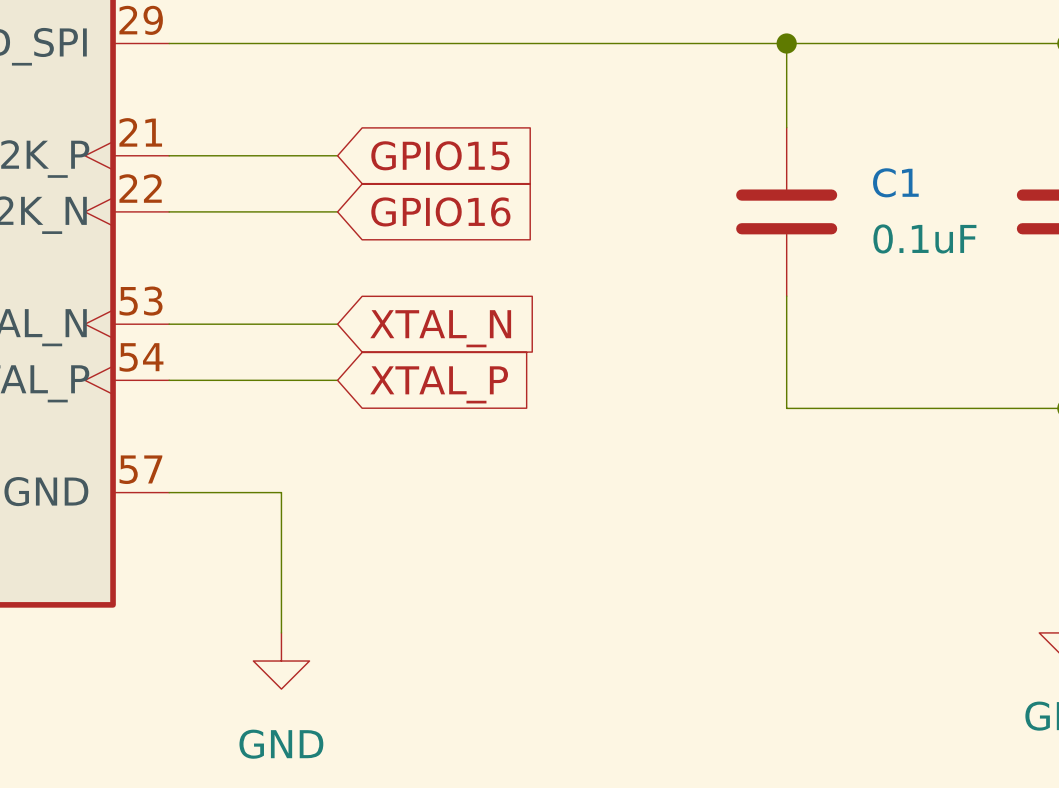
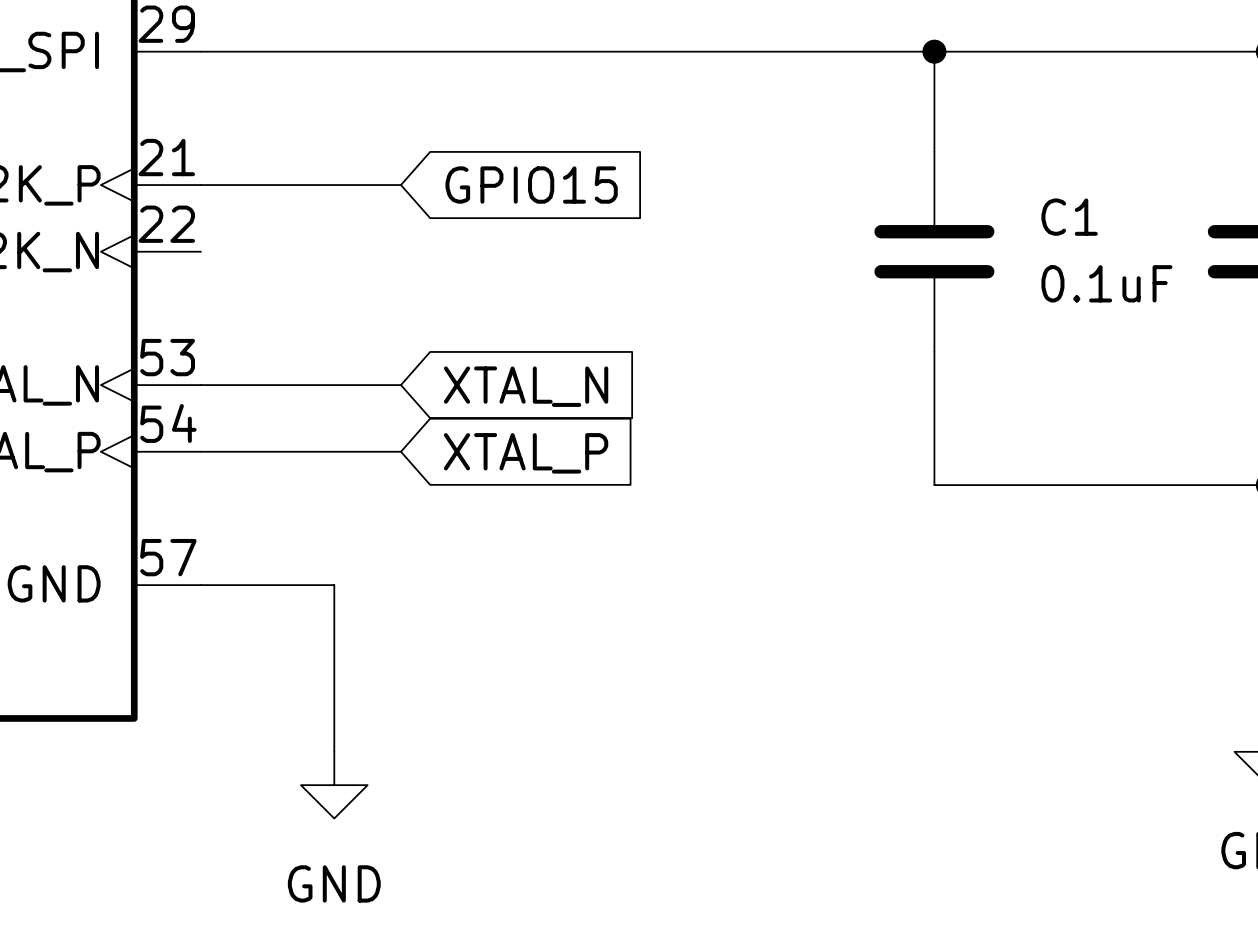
wire: (169, 211) (337, 211) -> none
global label: GPIO16 (440, 211) -> none

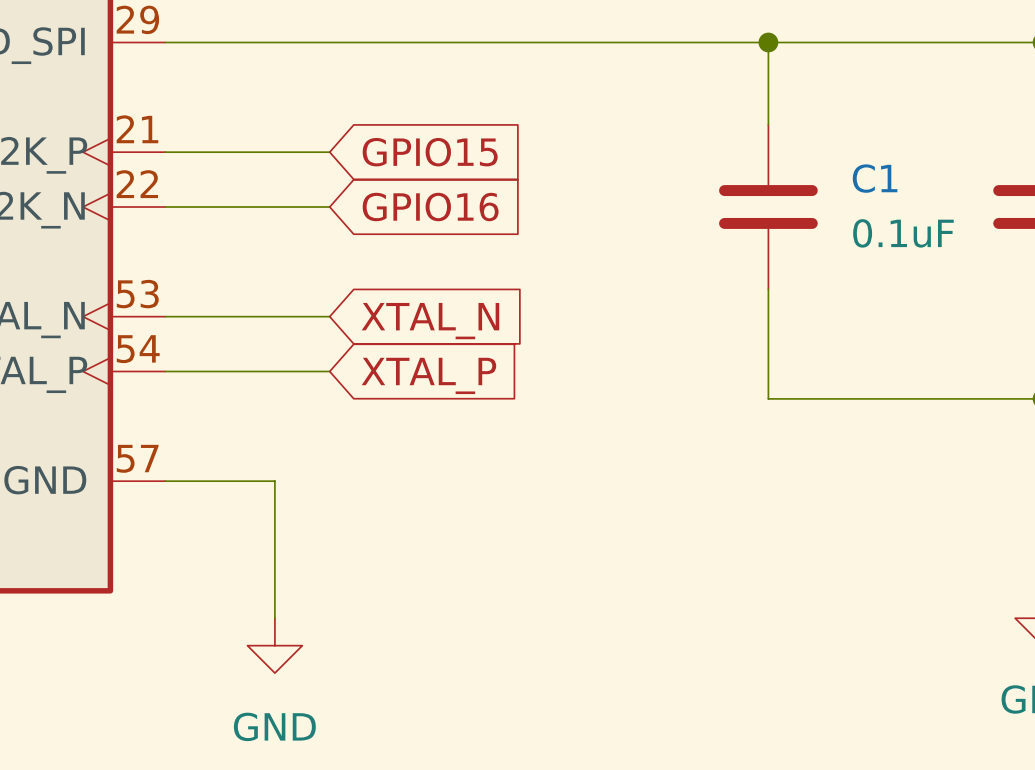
wire: none -> (165, 206) (329, 206)
global label: none -> GPIO16 (430, 207)

